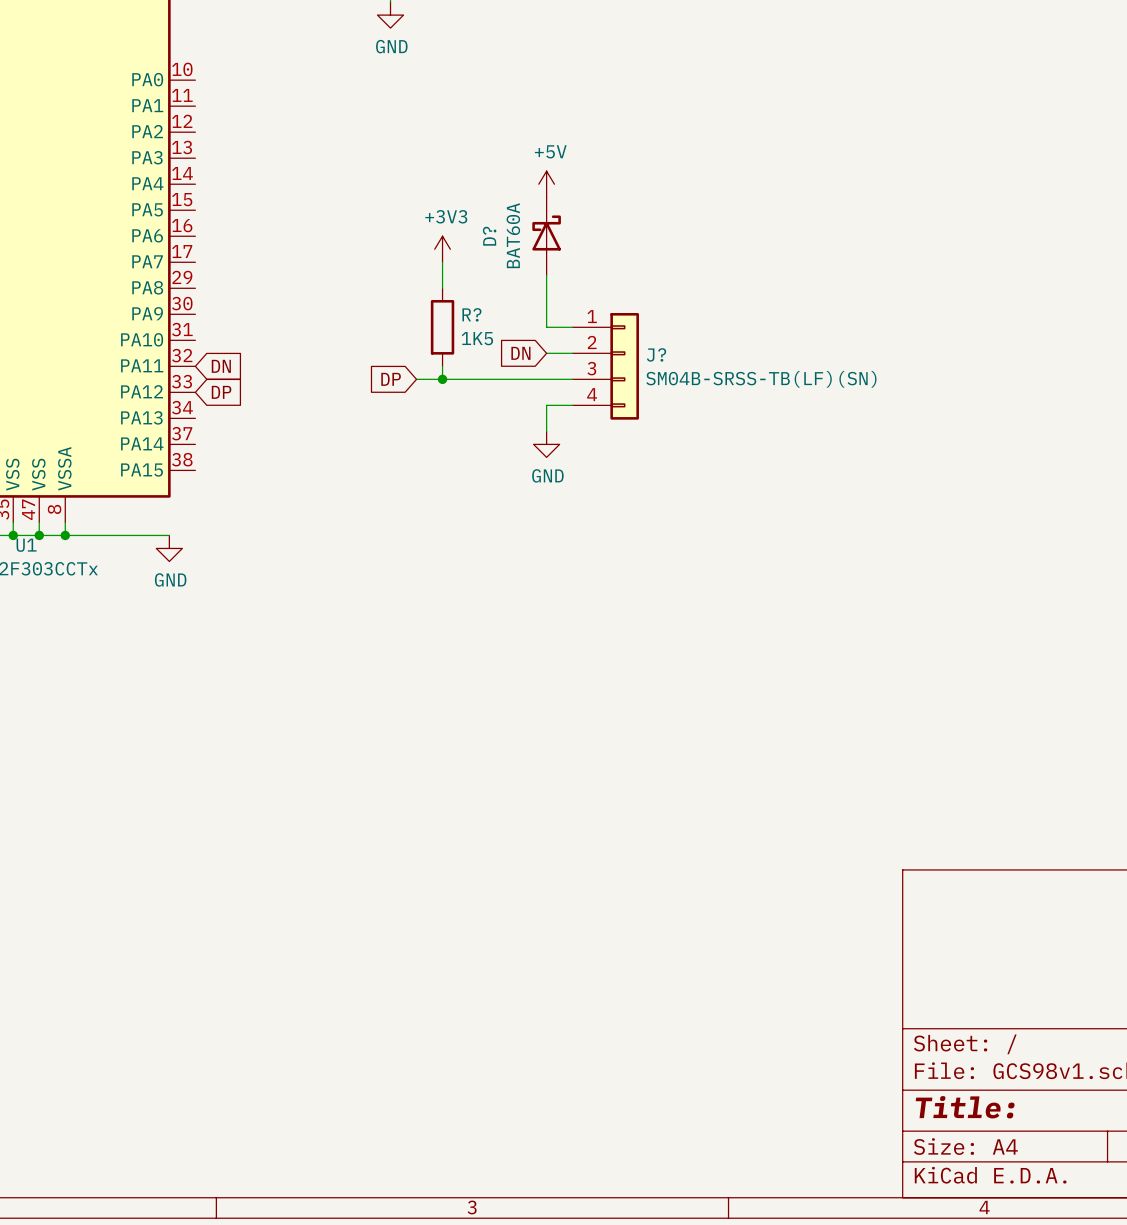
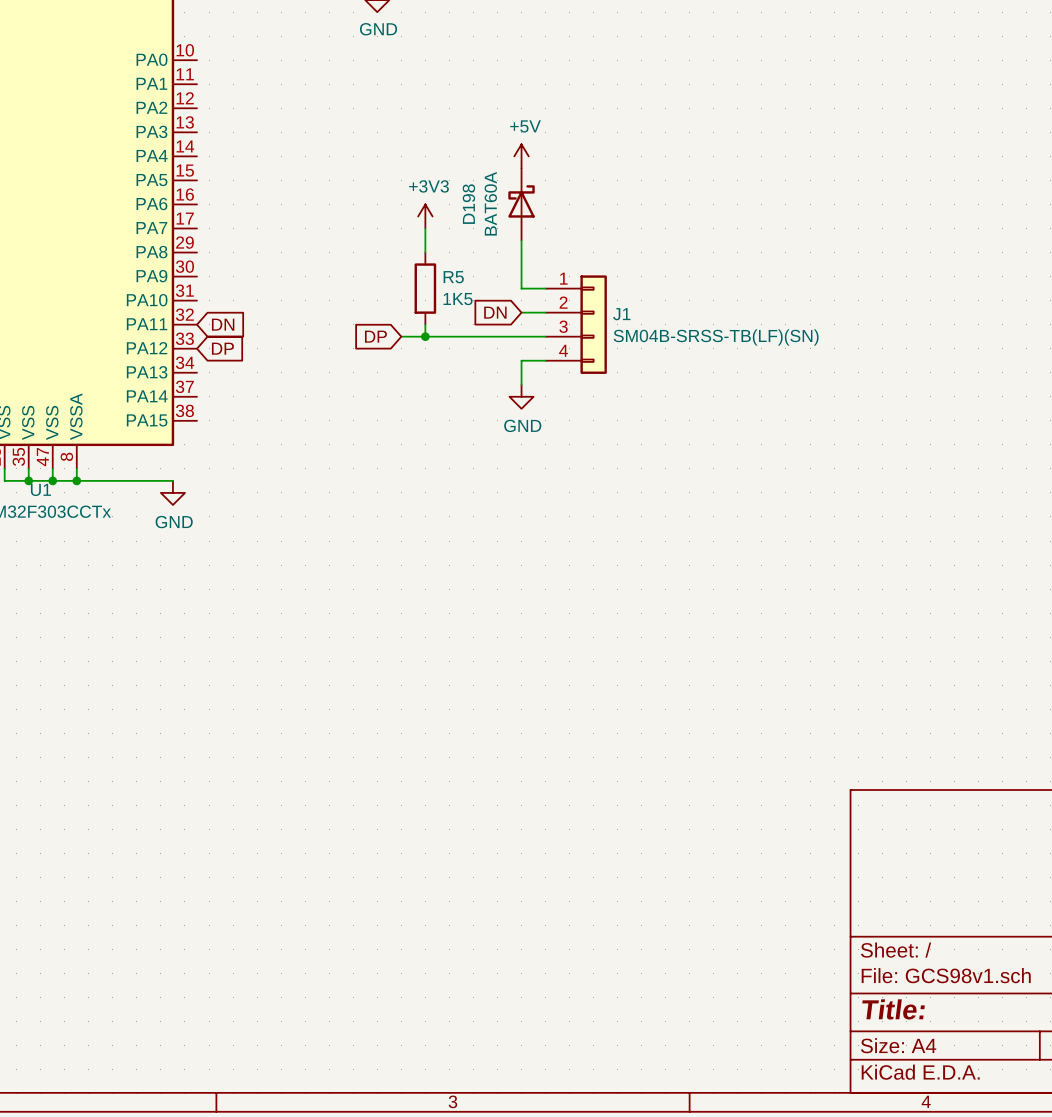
D? name: D? (489, 236) -> D198 (468, 204)
R? name: R? (471, 314) -> R5 (453, 277)
J? name: J? (656, 354) -> J1 (621, 314)

